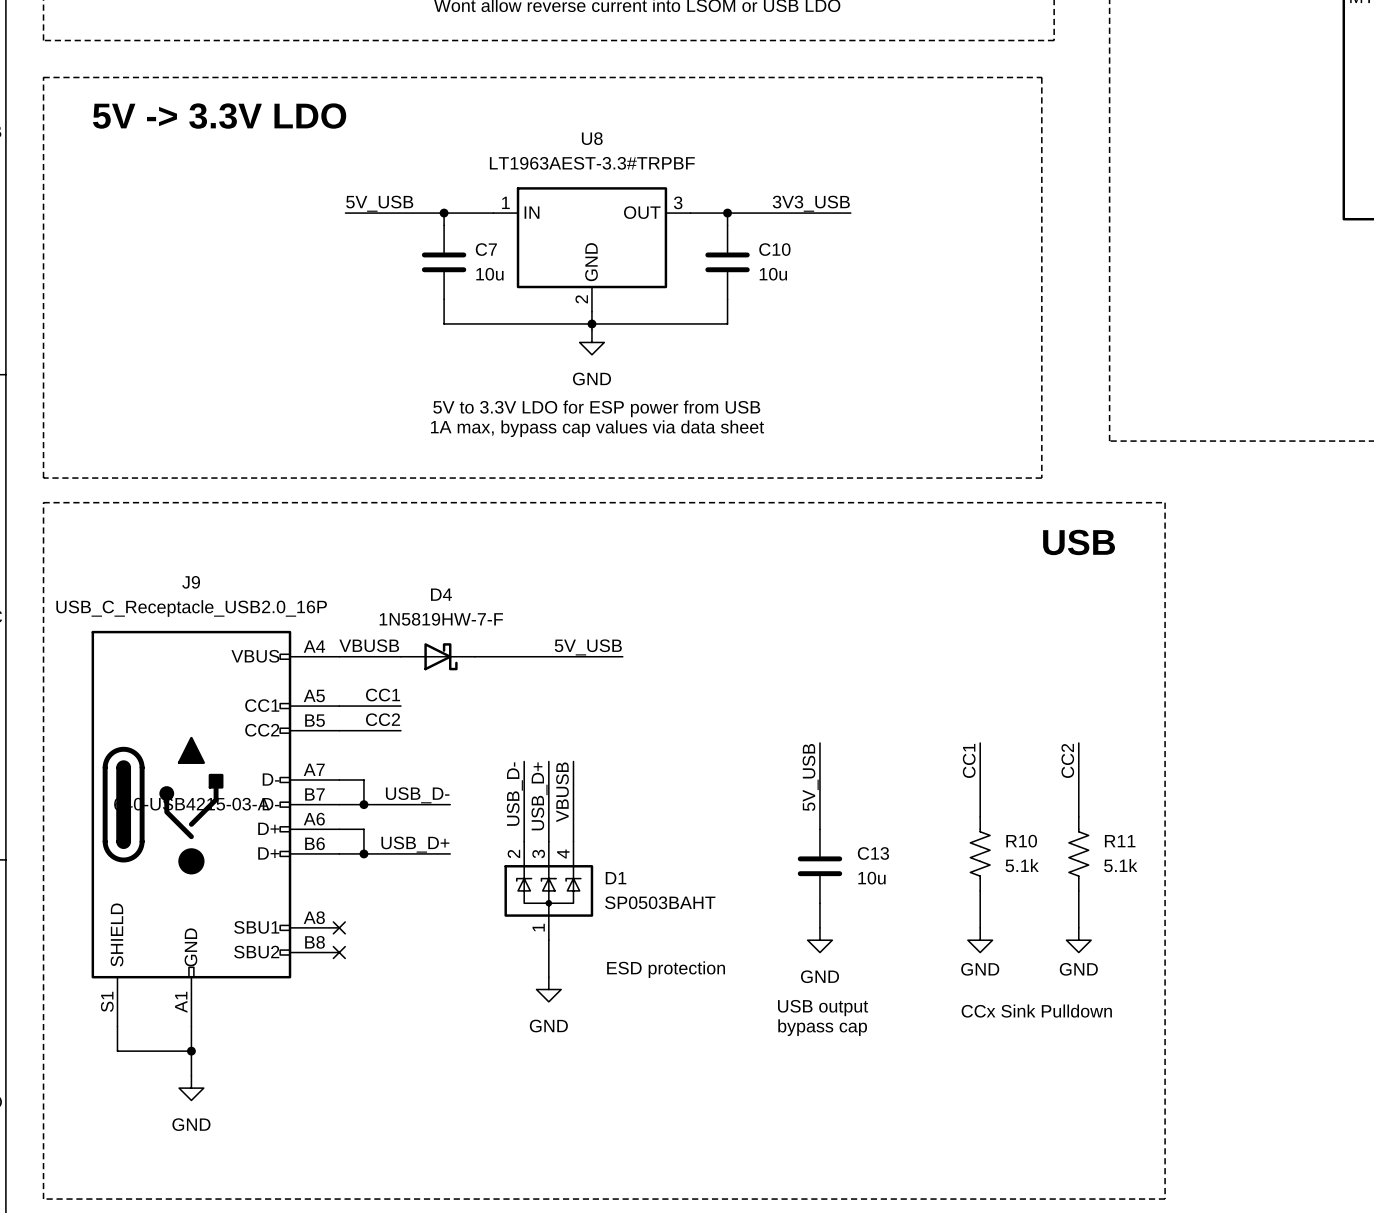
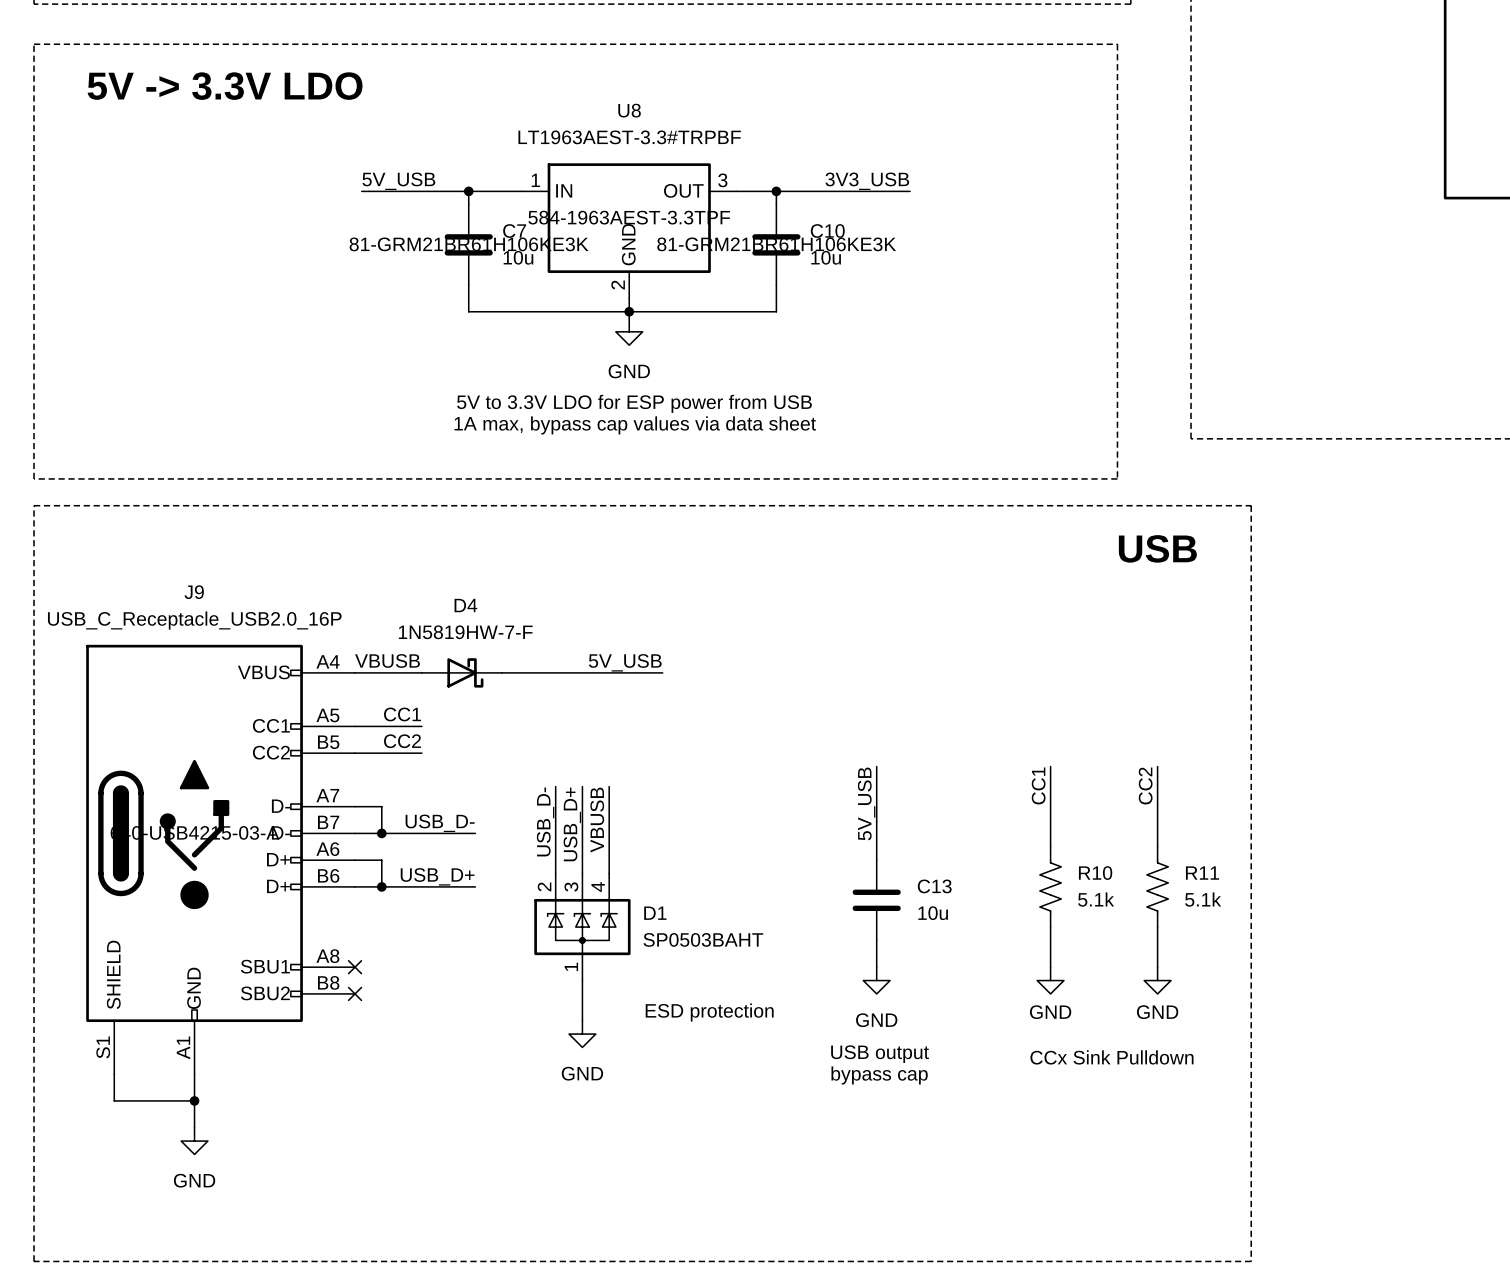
U8 text: none -> 584-1963AEST-3.3TPF (629, 217)
C7 text: none -> 81-GRM21BR61H106KE3K (469, 244)
C10 text: none -> 81-GRM21BR61H106KE3K (776, 244)

